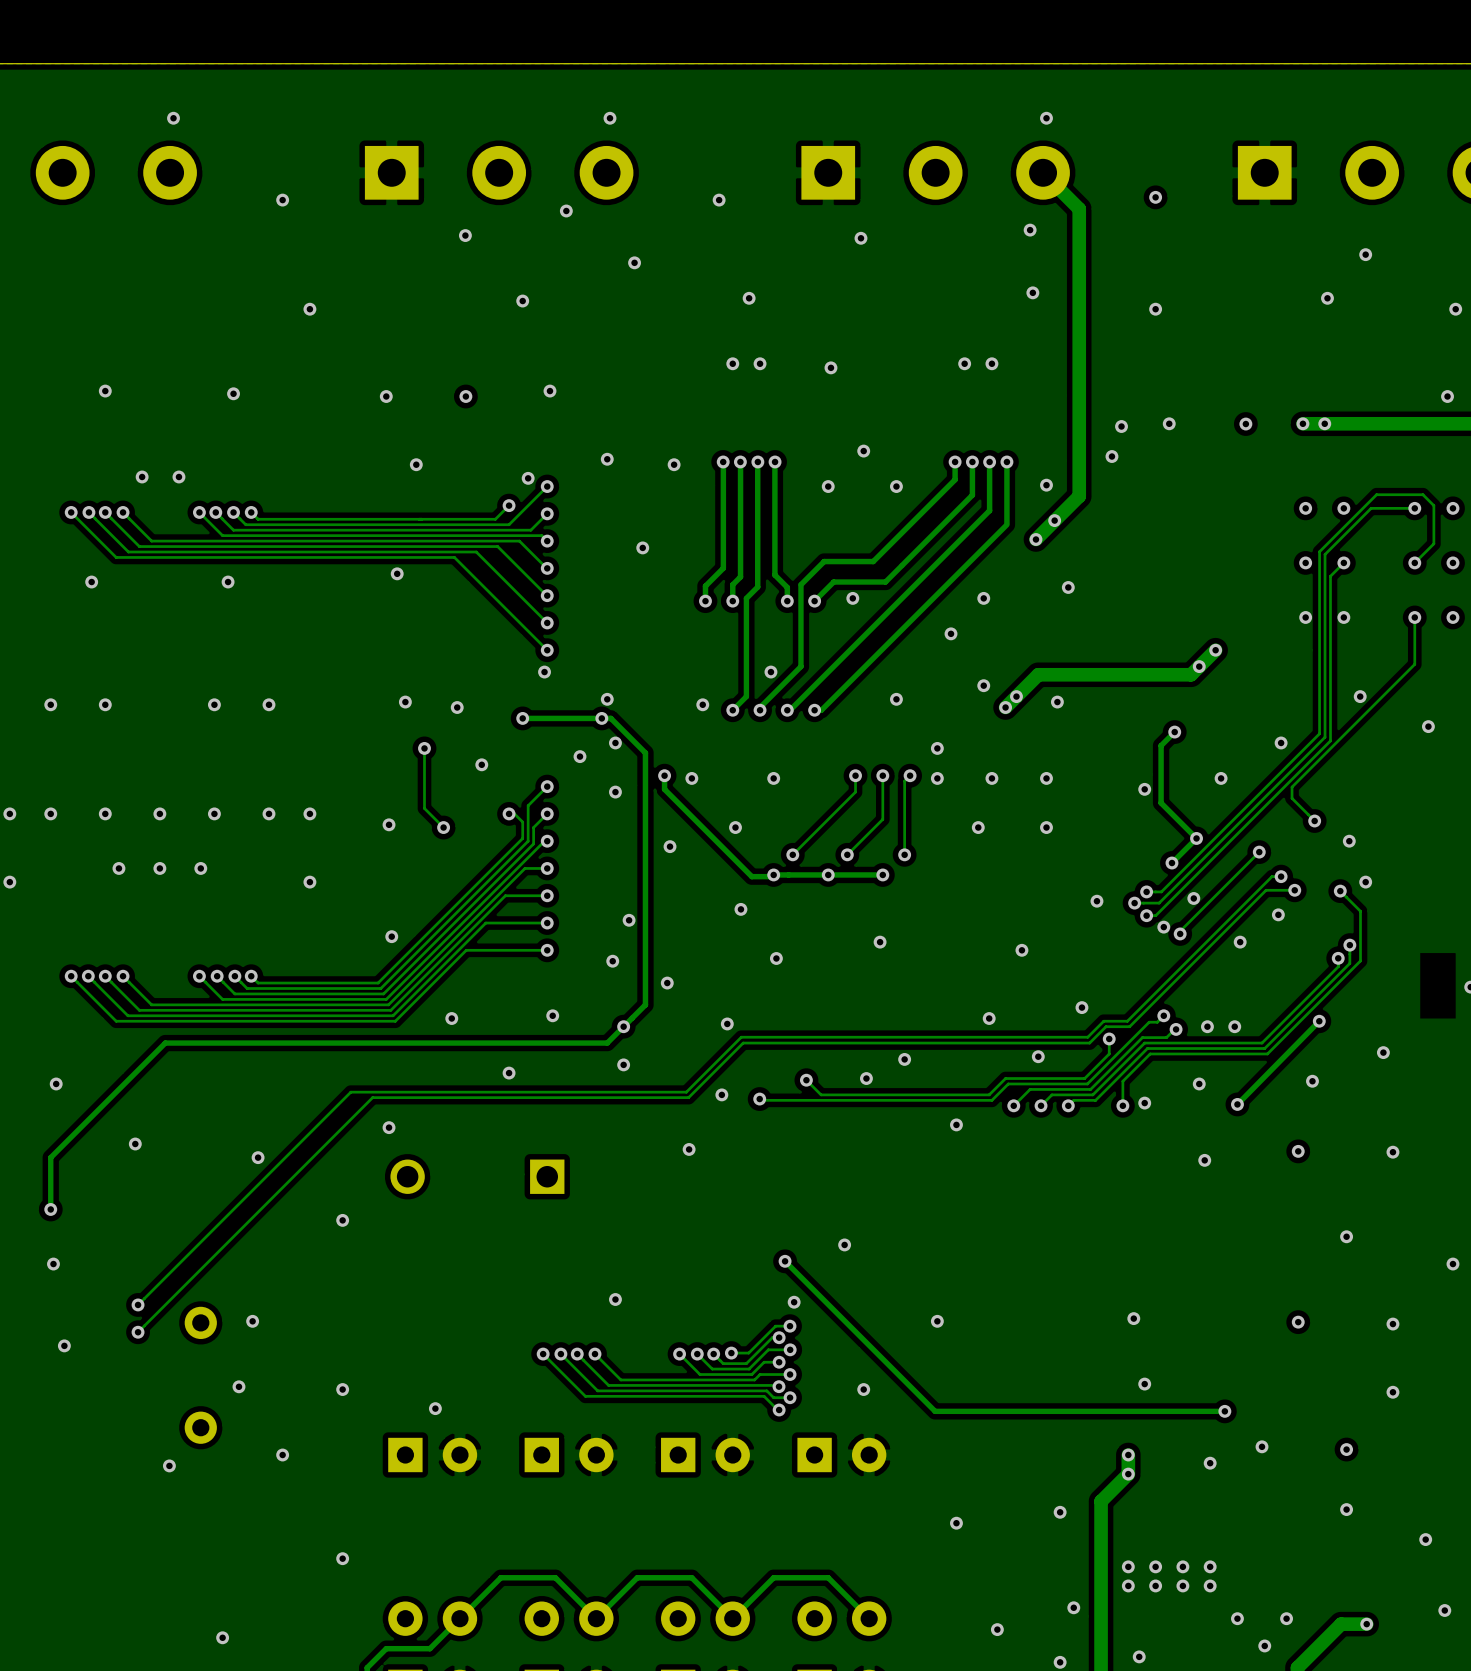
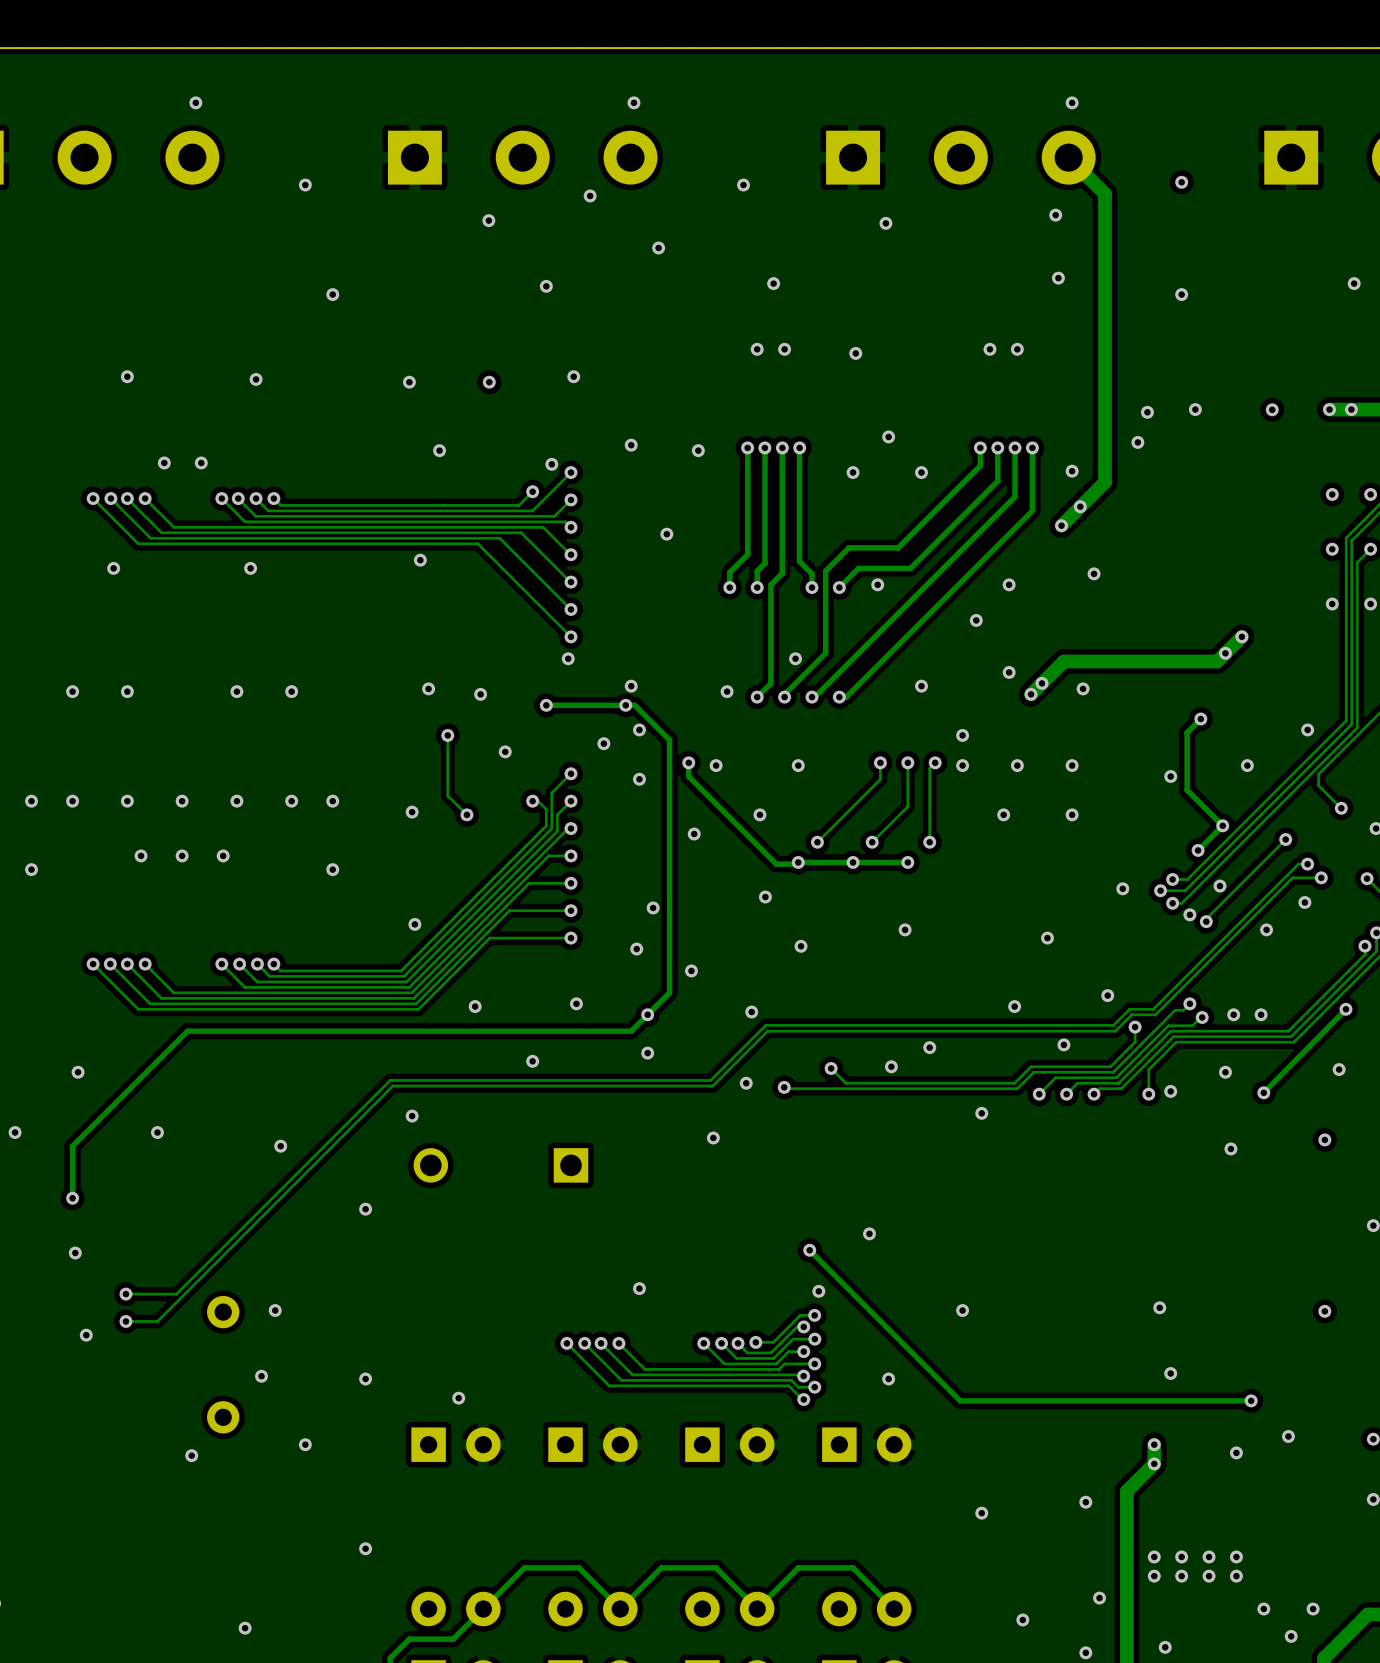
track: (367, 1092) (350, 1092) (138, 1304) -> (390, 1080) (176, 1294) (125, 1294)
track: (372, 1097) (138, 1332) -> (395, 1085) (392, 1085) (157, 1321) (125, 1321)
via: none -> (125, 1294)
via: (138, 1304) -> none
via: none -> (125, 1321)
via: (138, 1332) -> none

